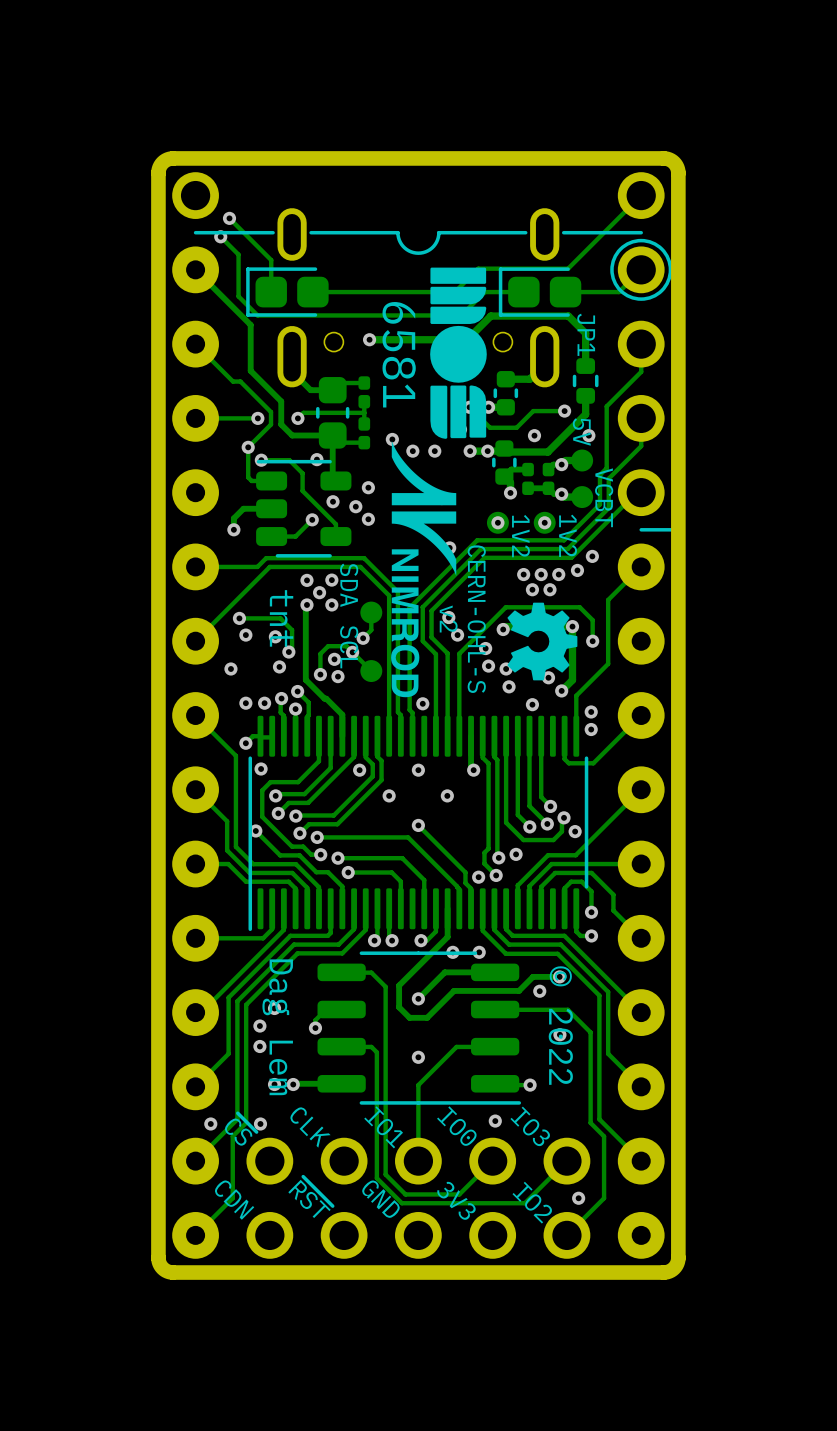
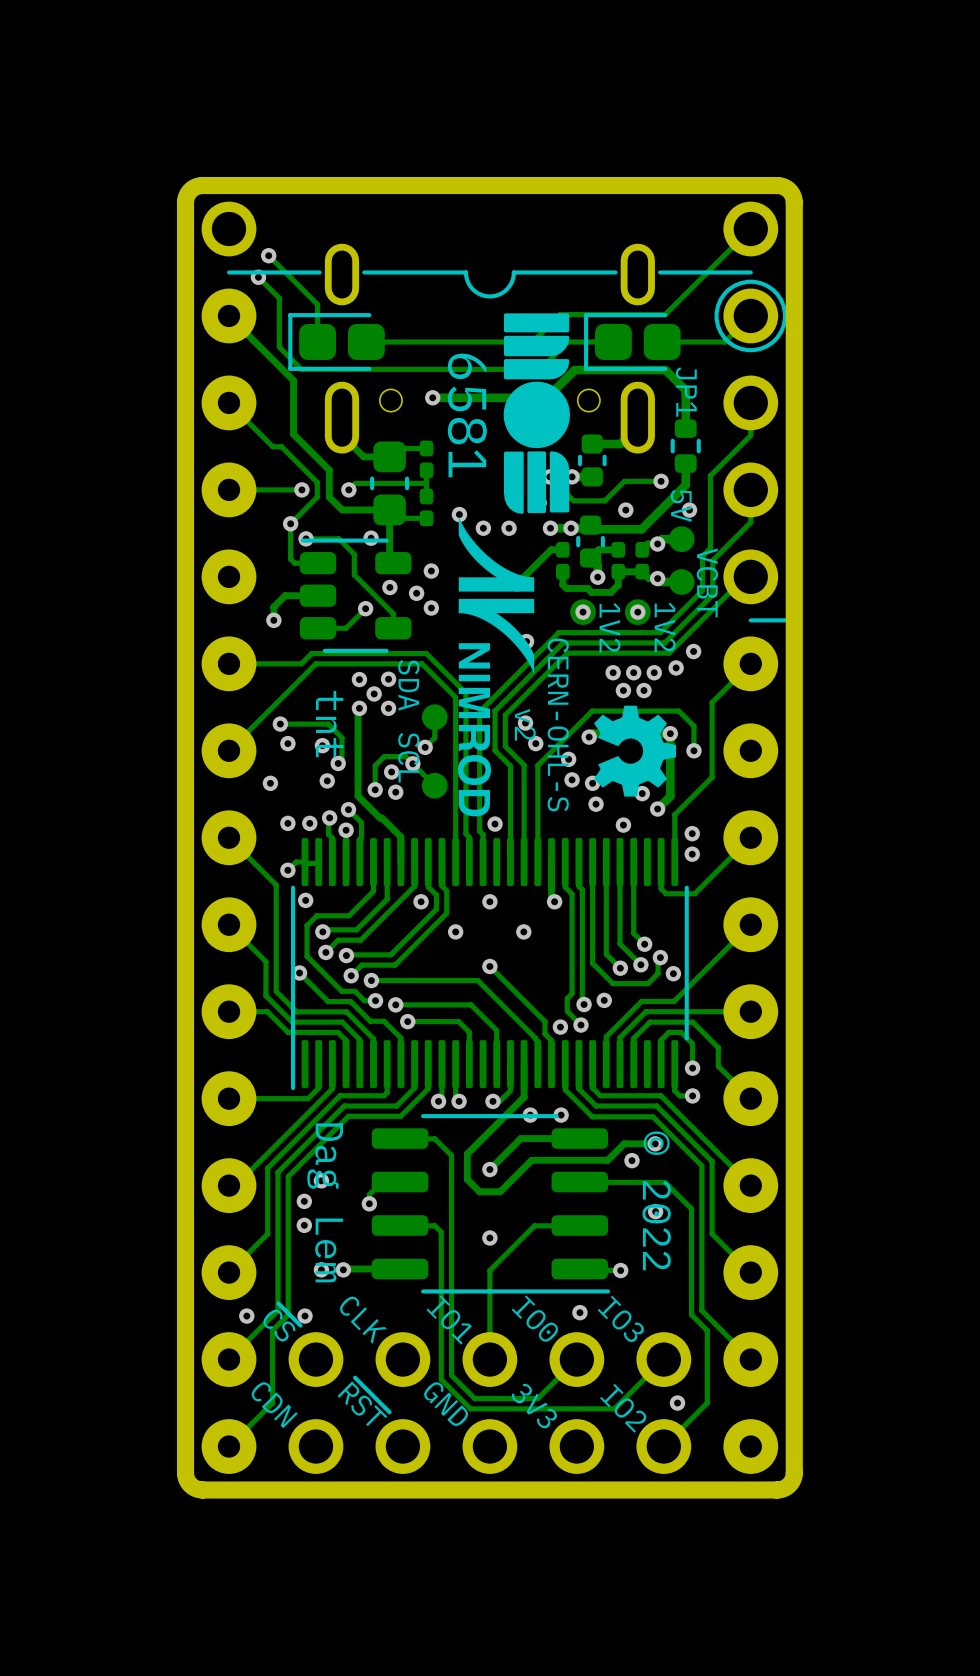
track: none -> (562, 549) (551, 549) (517, 583)
part: none -> (562, 560)
track: none -> (618, 571) (618, 585) (610, 592) (591, 592) (587, 588) (566, 588) (562, 584) (562, 571)

